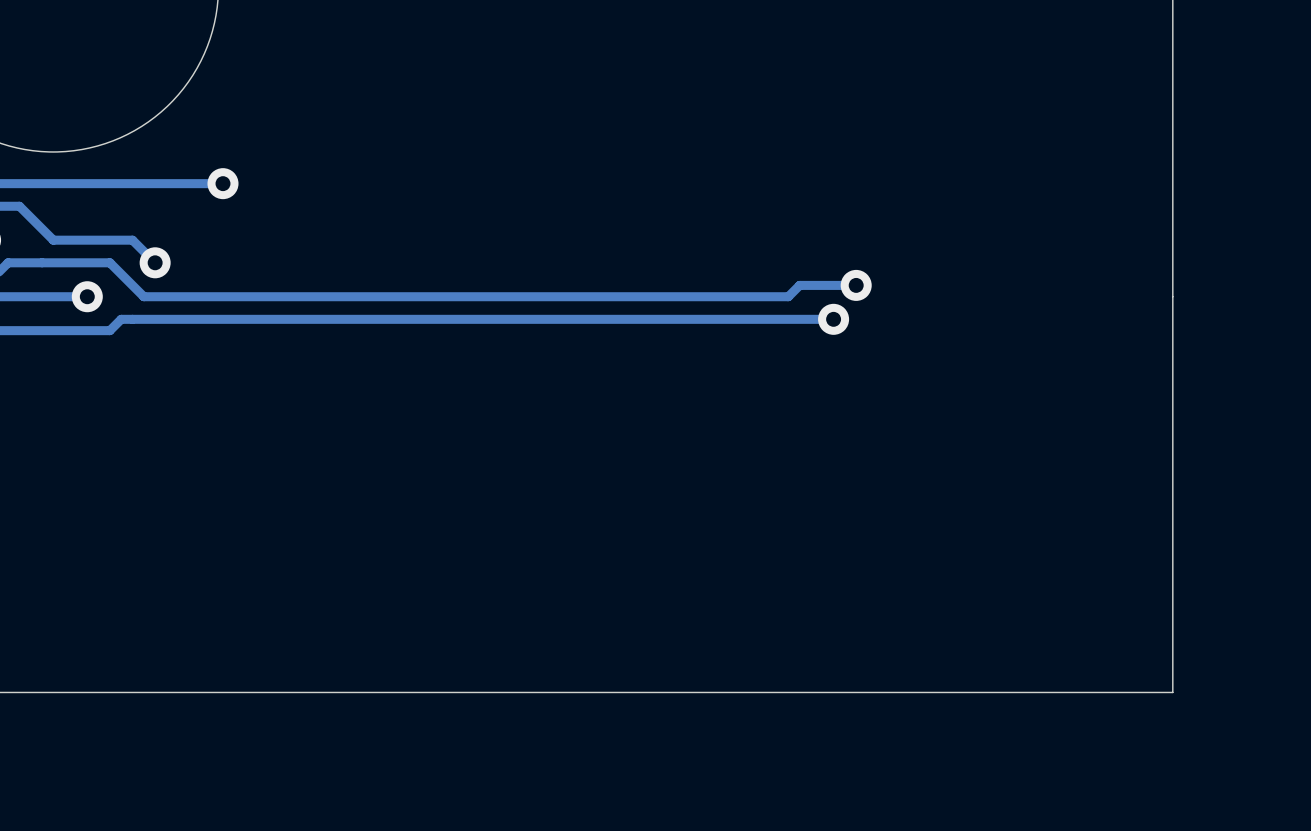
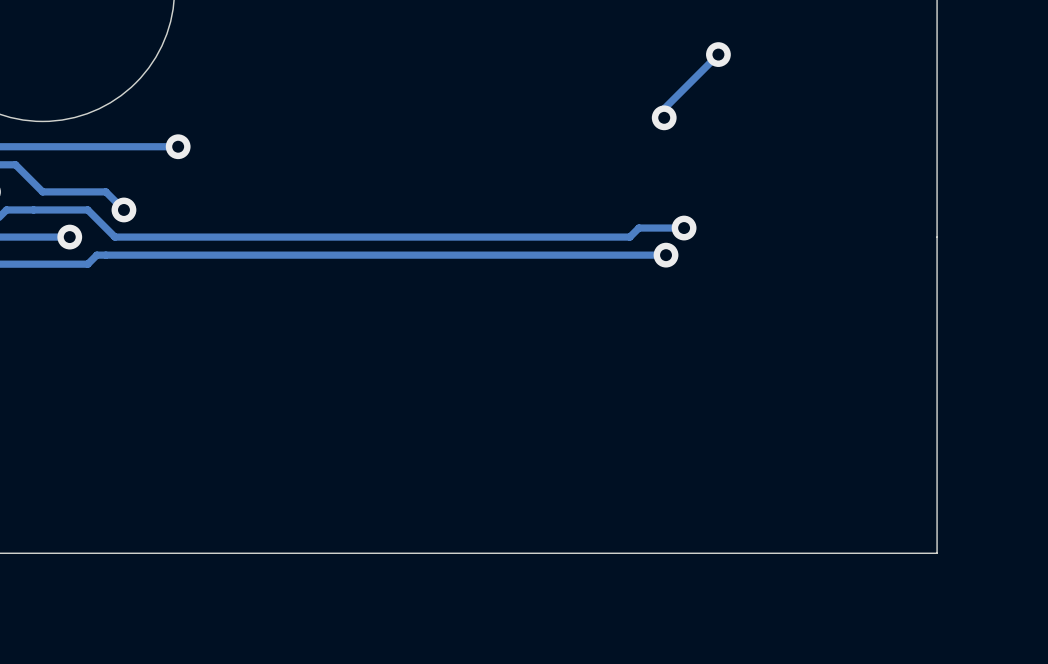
track: none -> (718, 54) (664, 108) (664, 117)
via: none -> (718, 54)
via: none -> (664, 117)

